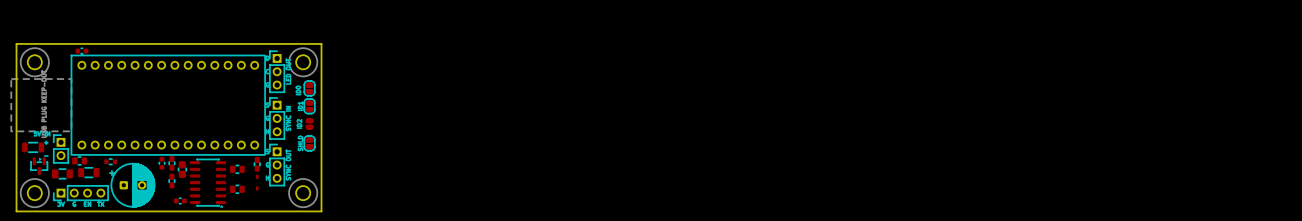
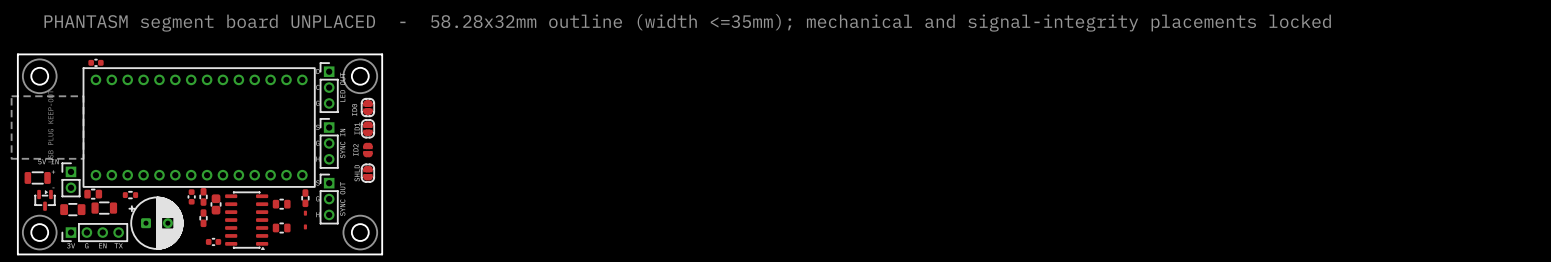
text: none -> PHANTASM segment board UNPLACED - 58.28x32mm outline (width <=35mm); mechanical and signal-integrity placements locked (687, 22)

